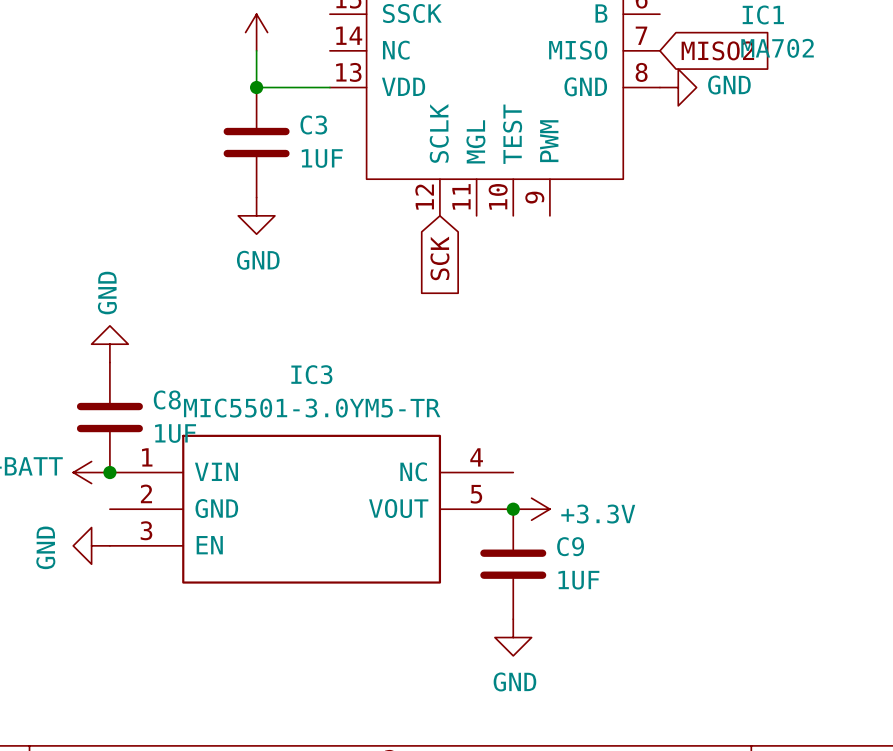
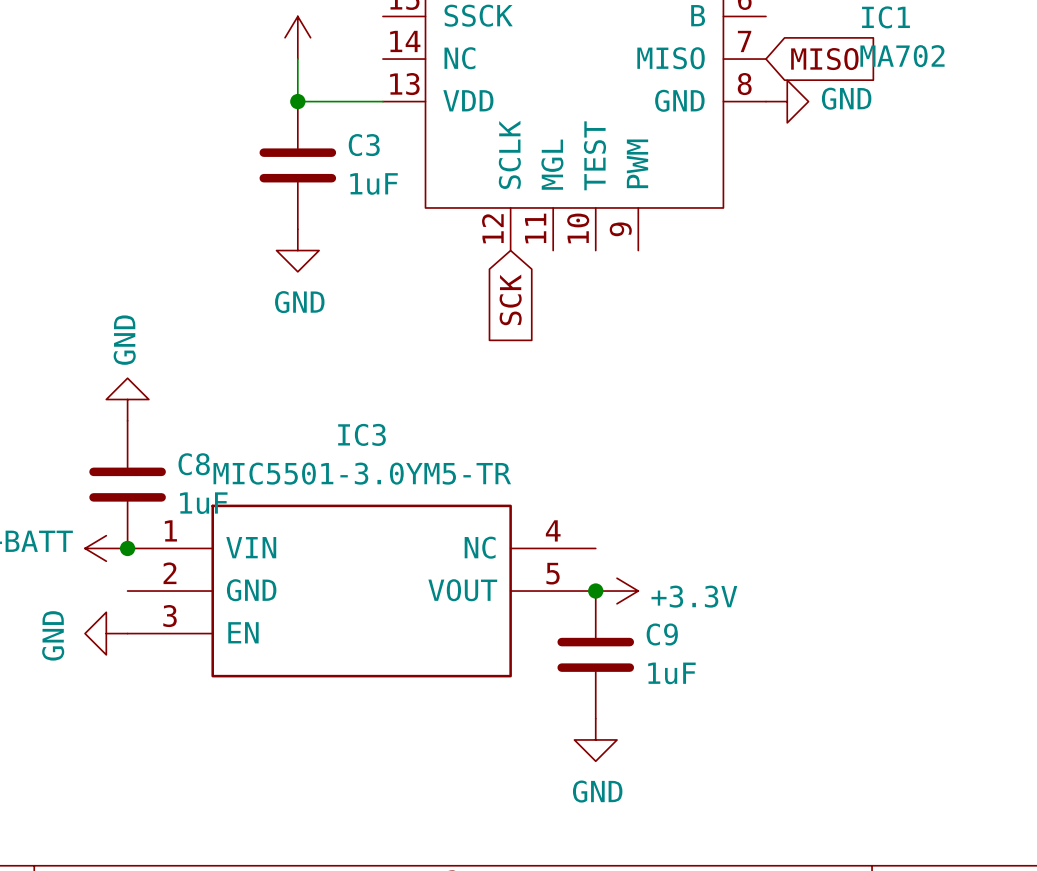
global label: MISO2 (717, 50) -> MISO (824, 59)
C3 value: 1UF (322, 158) -> 1uF (374, 183)
C8 value: 1UF (175, 433) -> 1uF (203, 503)
C9 value: 1UF (578, 580) -> 1uF (671, 673)

